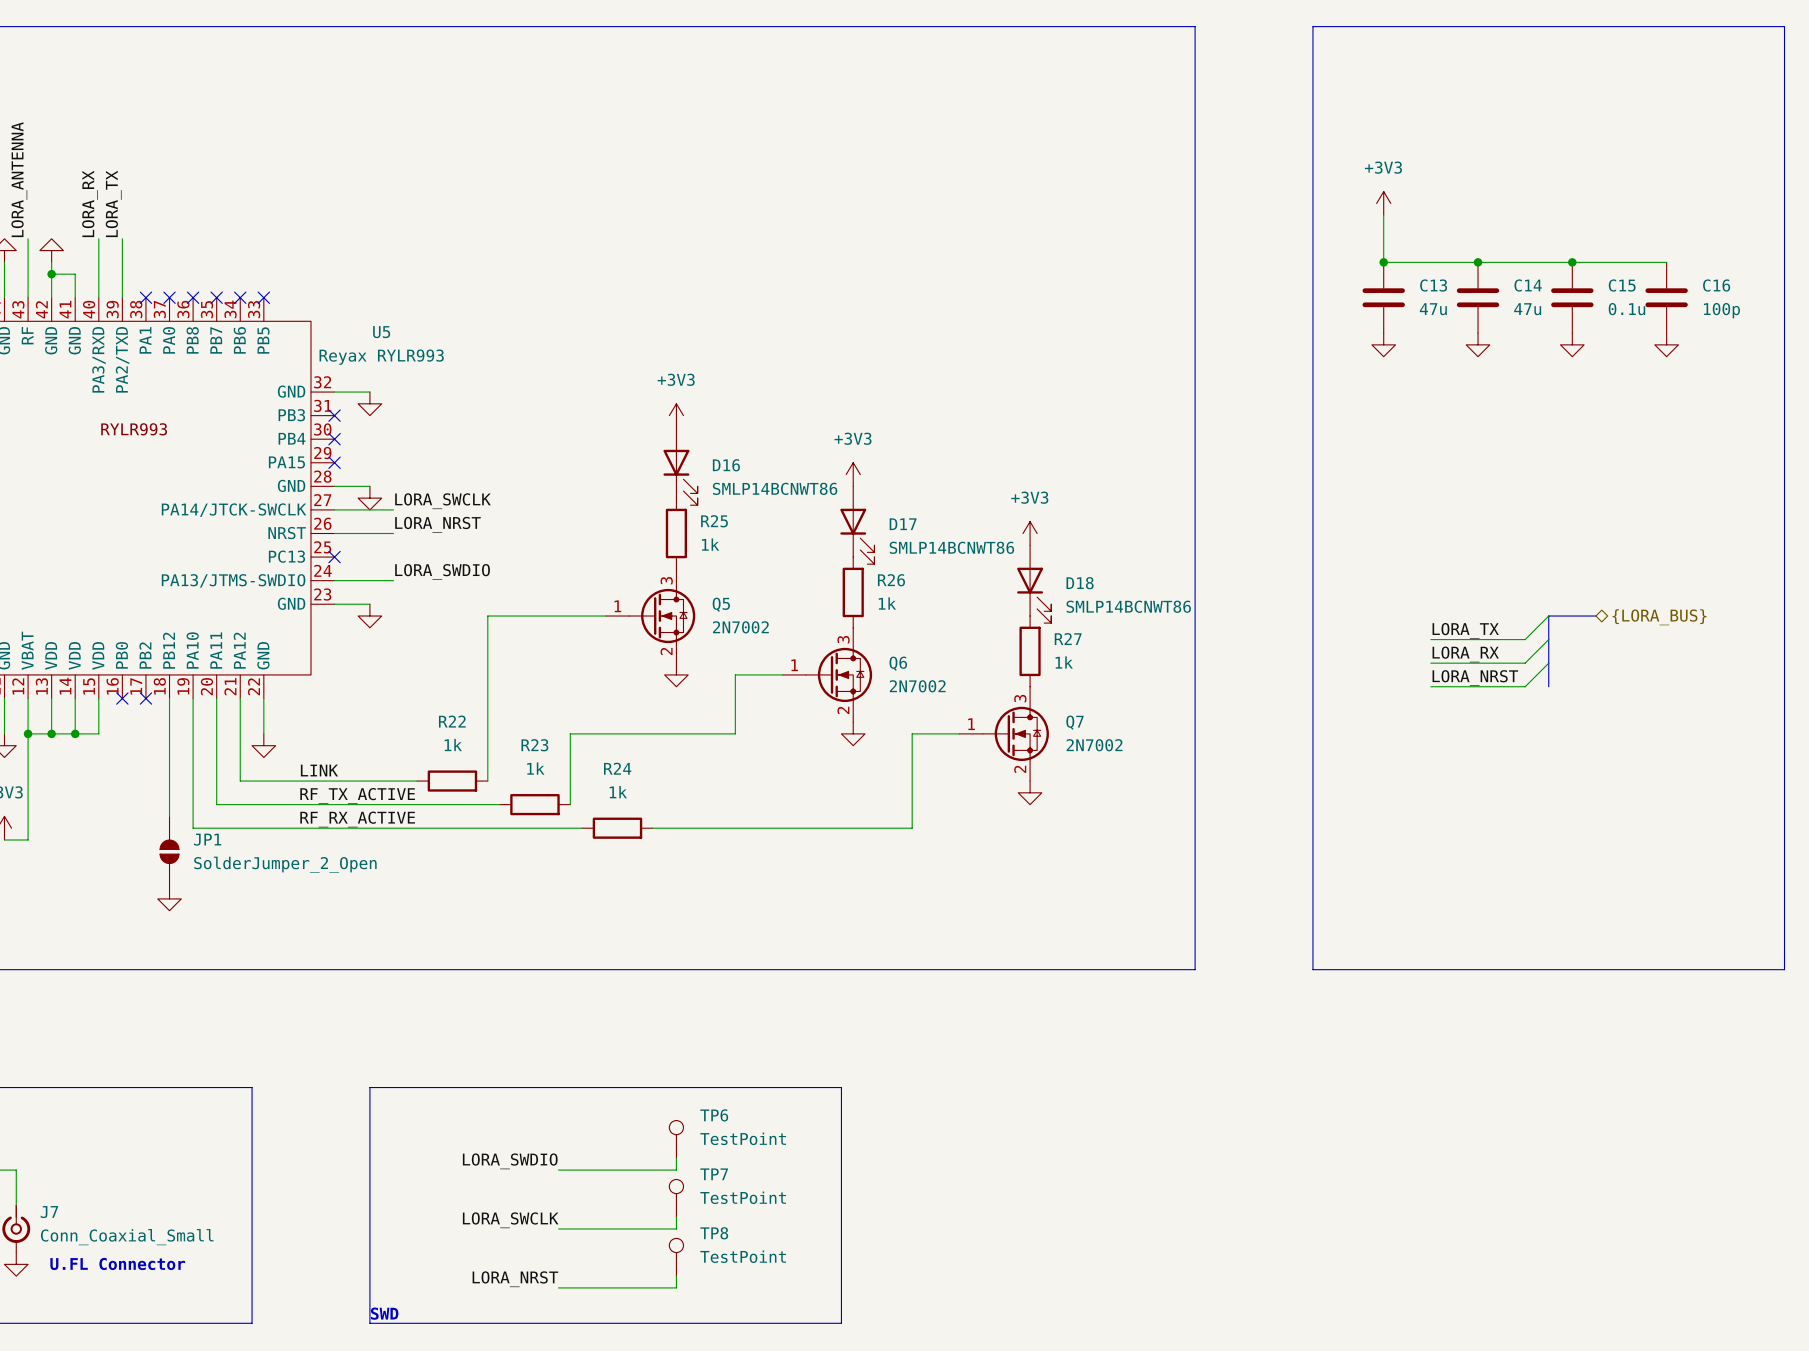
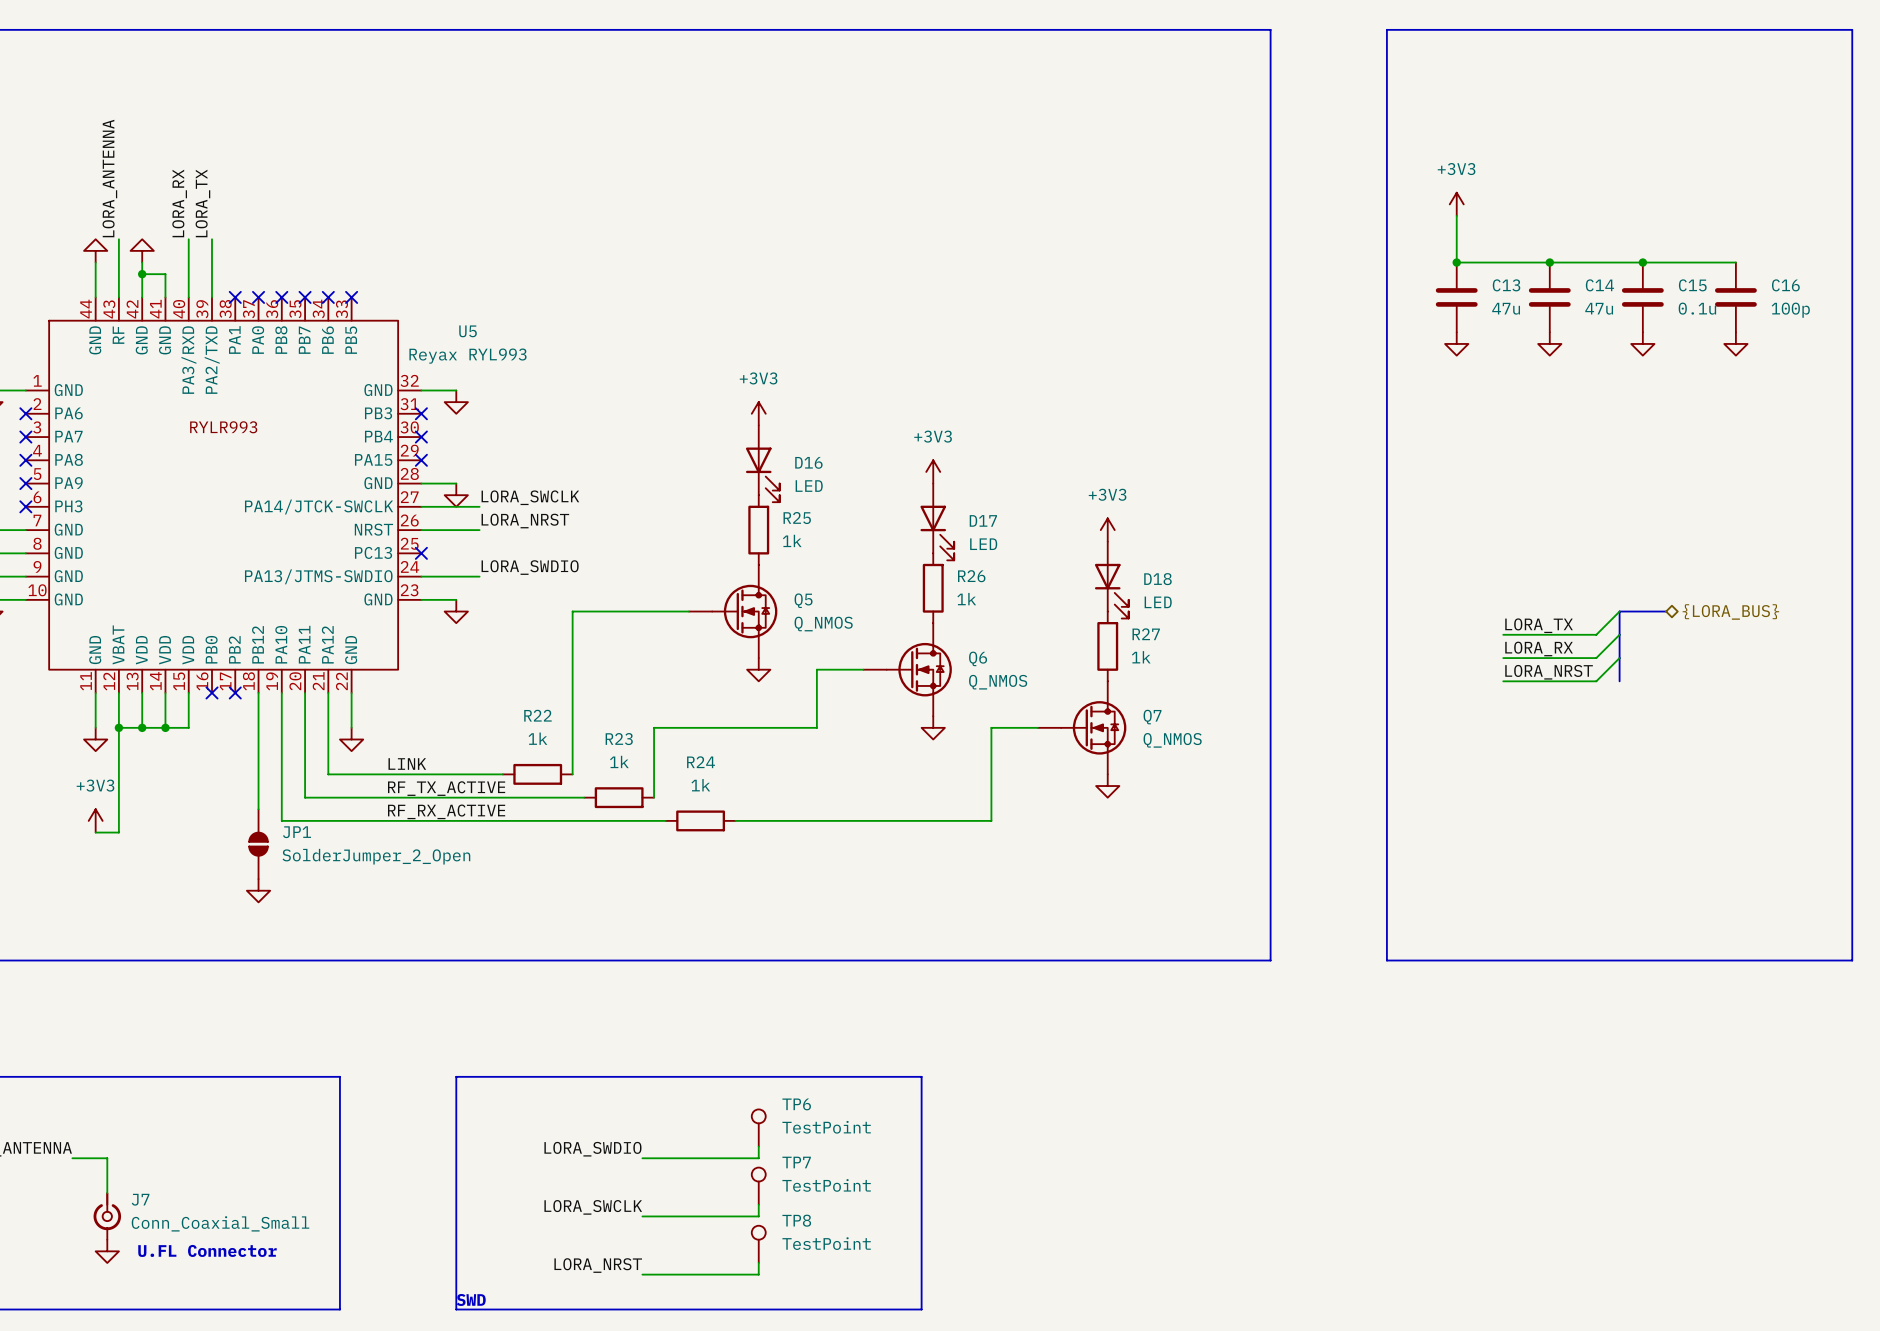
U5 value: Reyax RYLR993 (381, 357) -> Reyax RYL993 (467, 356)
D16 value: SMLP14BCNWT86 (775, 488) -> LED (809, 486)
D17 value: SMLP14BCNWT86 (951, 547) -> LED (983, 544)
Q5 pin number: 3 (666, 580) -> none
Q5 pin number: 1 (617, 606) -> none
D18 value: SMLP14BCNWT86 (1128, 606) -> LED (1158, 602)
Q5 value: 2N7002 (740, 627) -> Q_NMOS (823, 624)
Q6 pin number: 3 (843, 639) -> none
Q5 pin number: 2 (666, 651) -> none
Q6 pin number: 1 (794, 665) -> none
Q6 value: 2N7002 (917, 686) -> Q_NMOS (998, 682)
Q7 pin number: 3 (1020, 698) -> none
Q6 pin number: 2 (843, 710) -> none
Q7 pin number: 1 (971, 724) -> none
Q7 value: 2N7002 (1094, 745) -> Q_NMOS (1172, 740)
Q7 pin number: 2 (1020, 769) -> none

